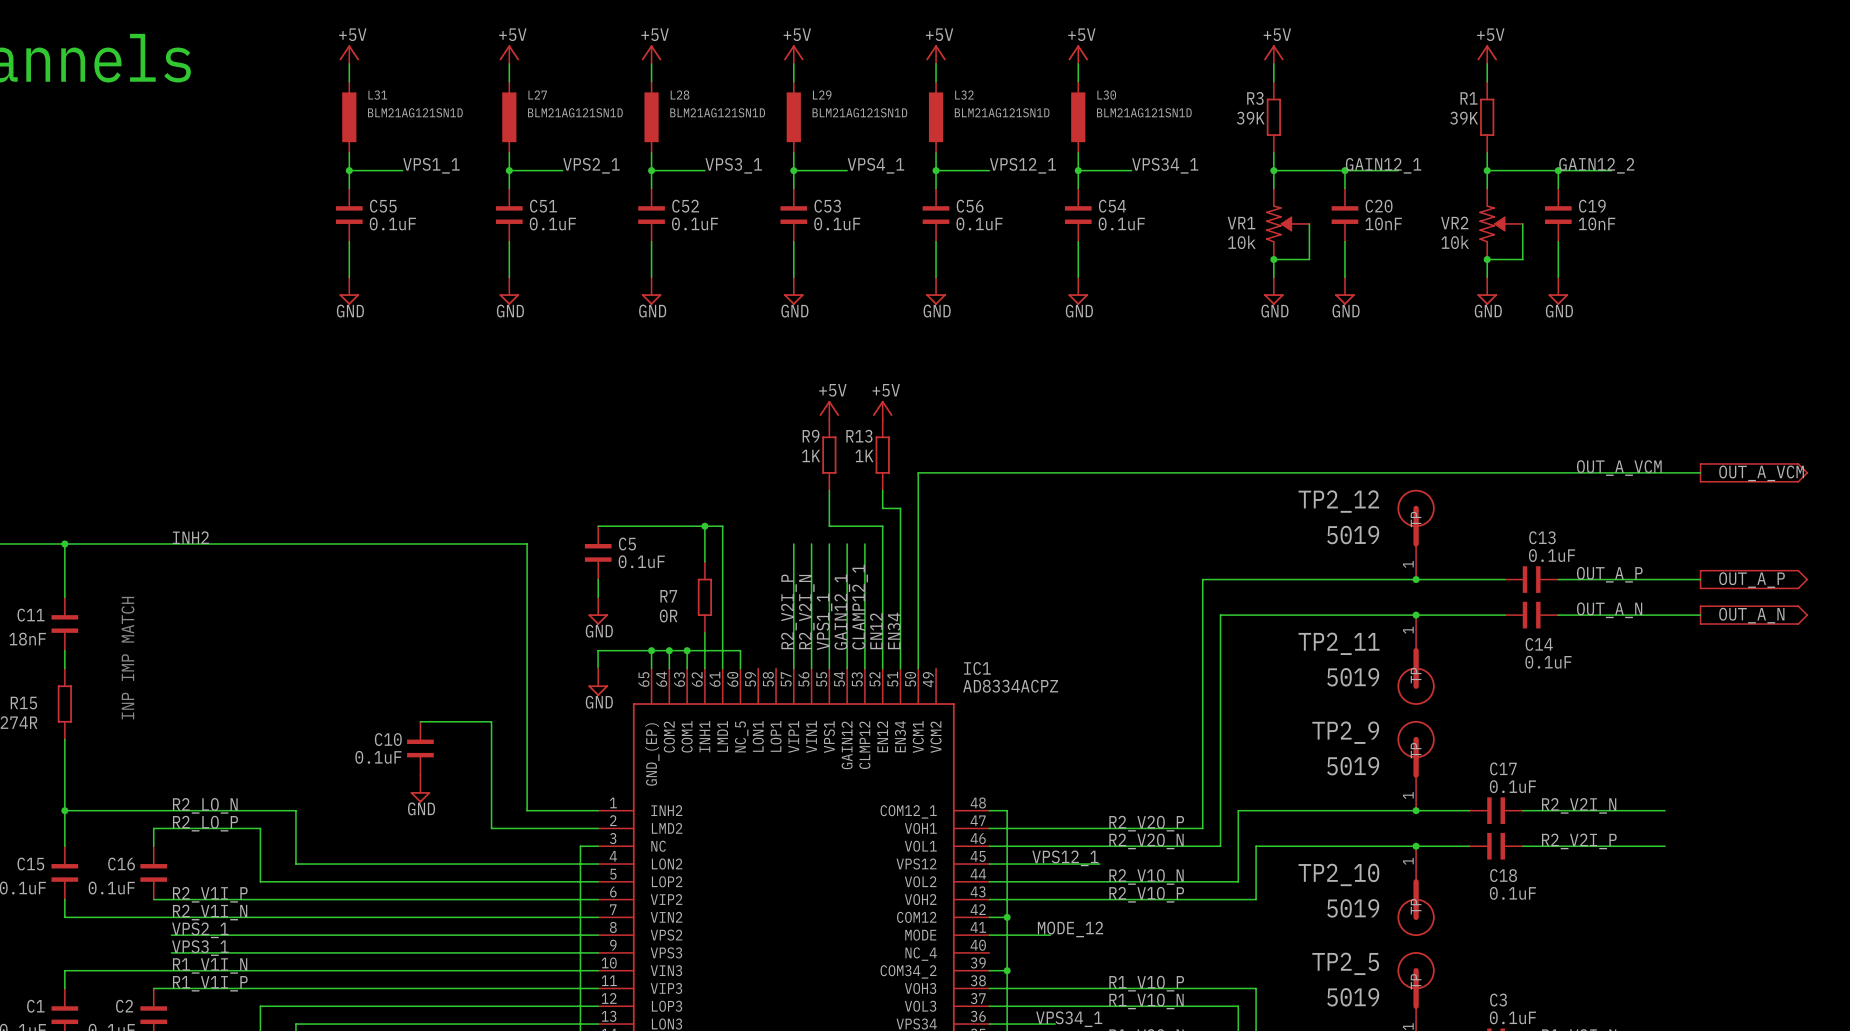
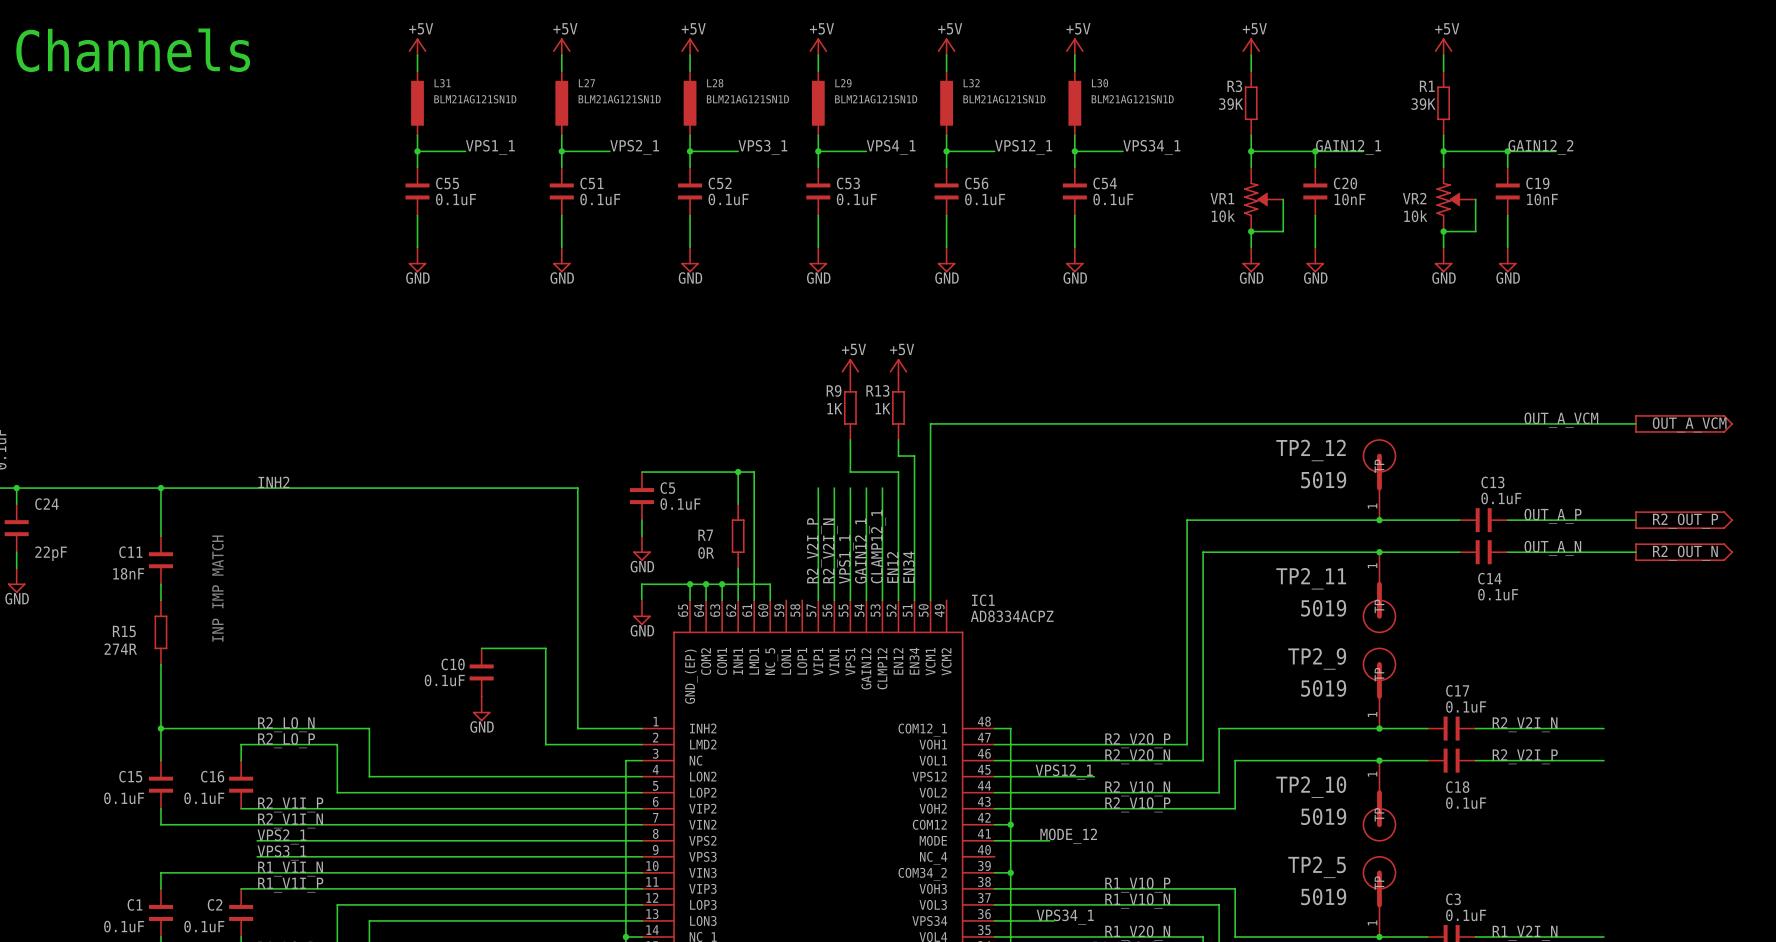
part text: OUT_A_P (1752, 580) -> R2_OUT_P (1685, 521)
part text: OUT_A_N (1751, 615) -> R2_OUT_N (1685, 553)

